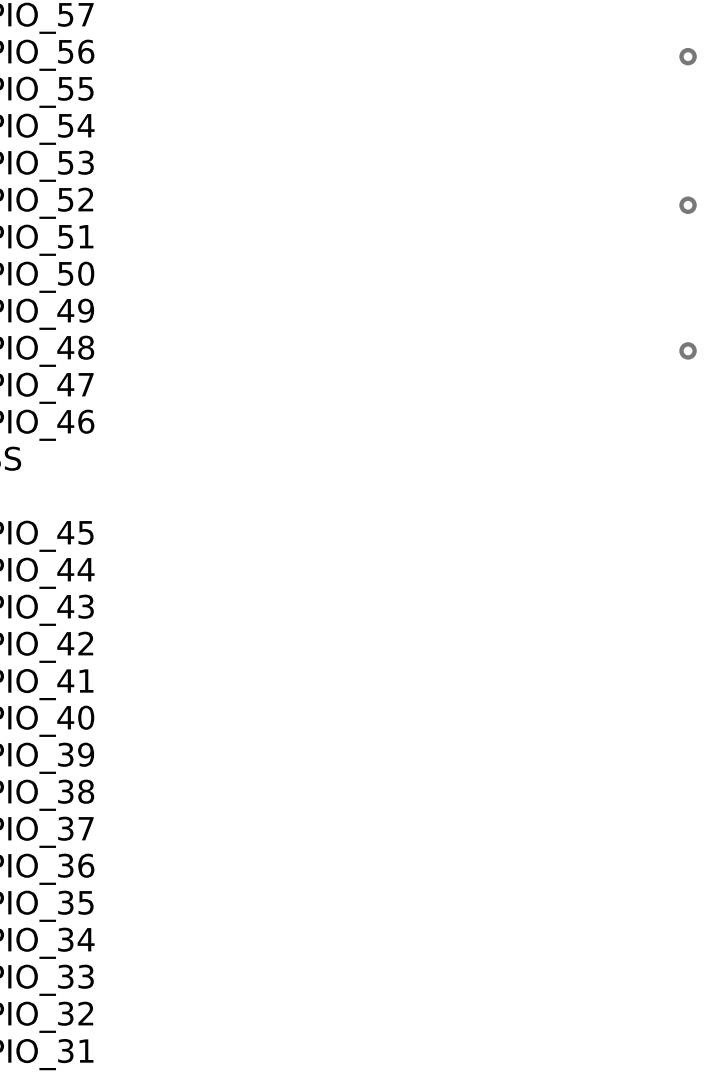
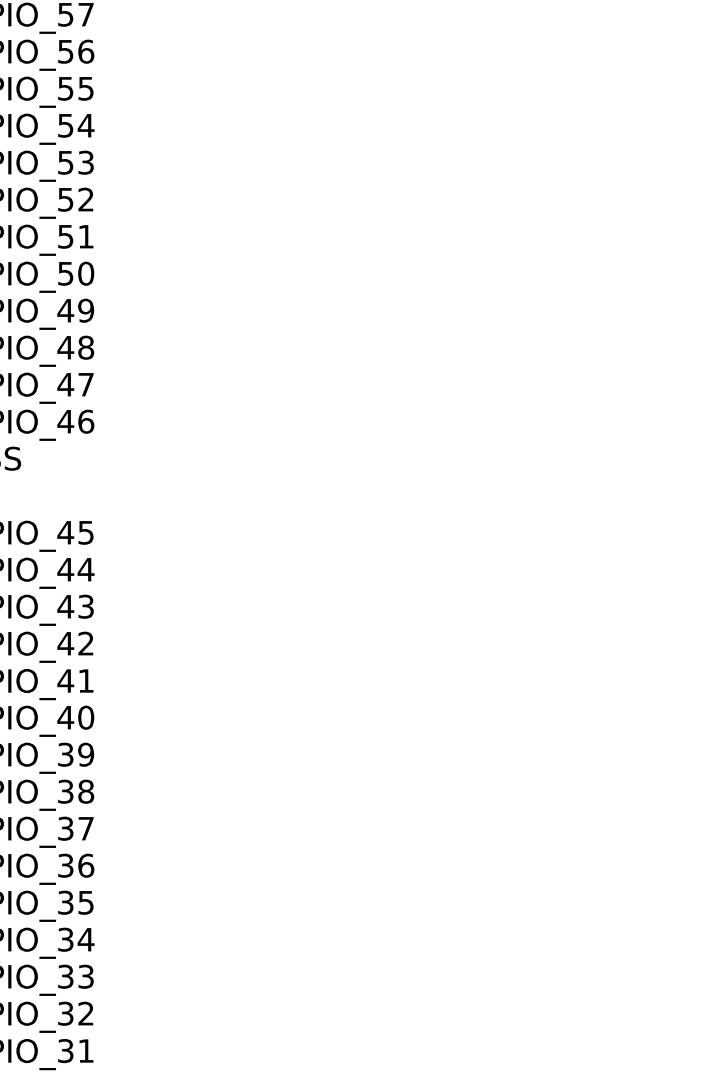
via: (688, 56) -> none
via: (688, 205) -> none
via: (688, 350) -> none

